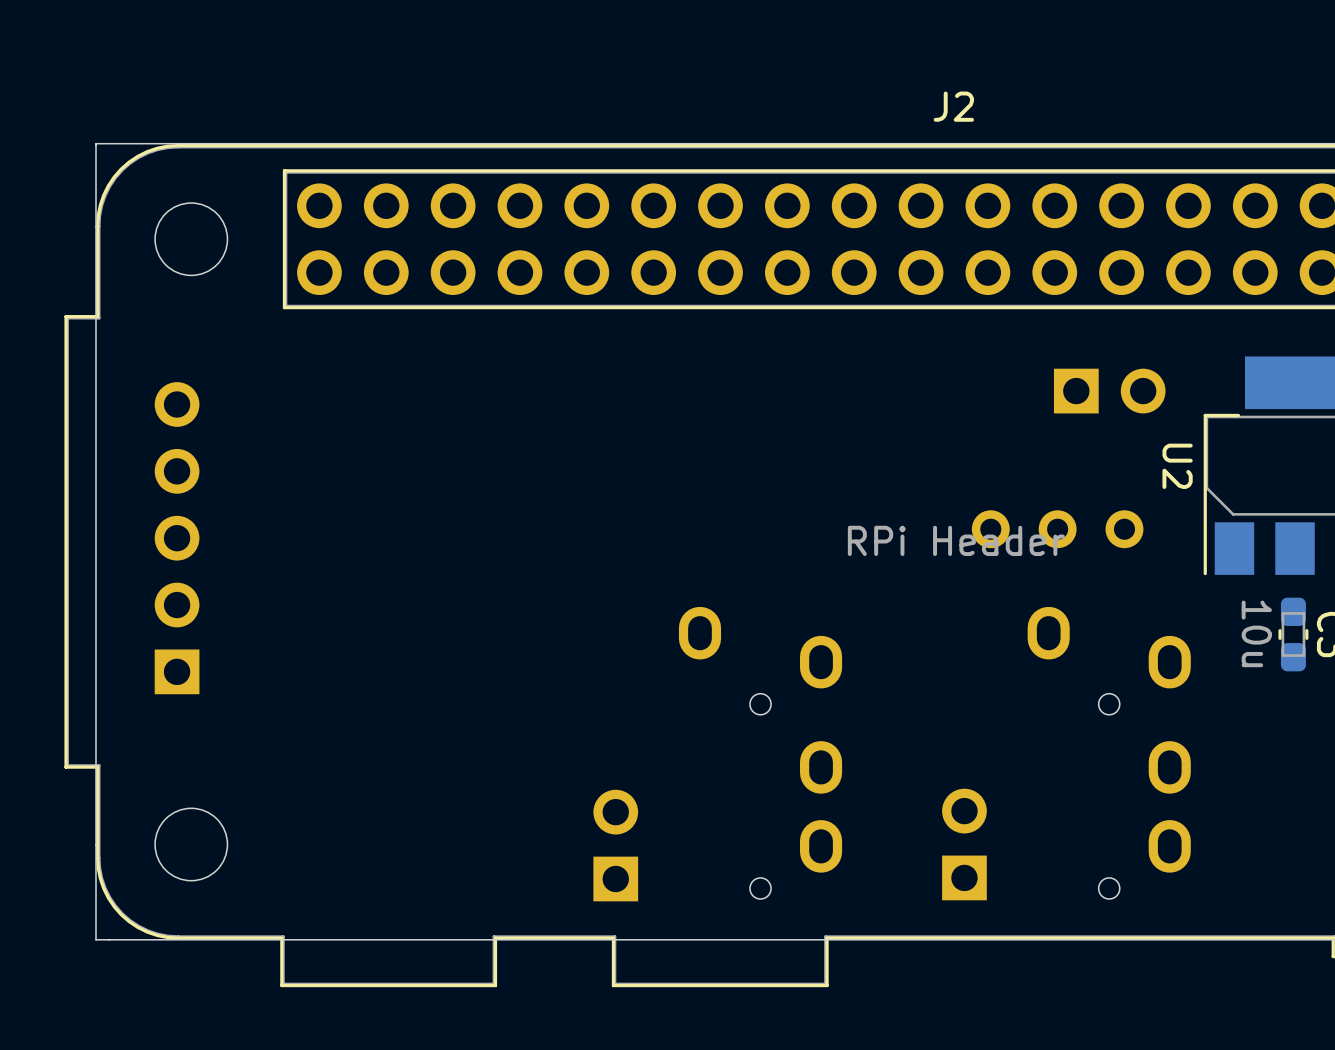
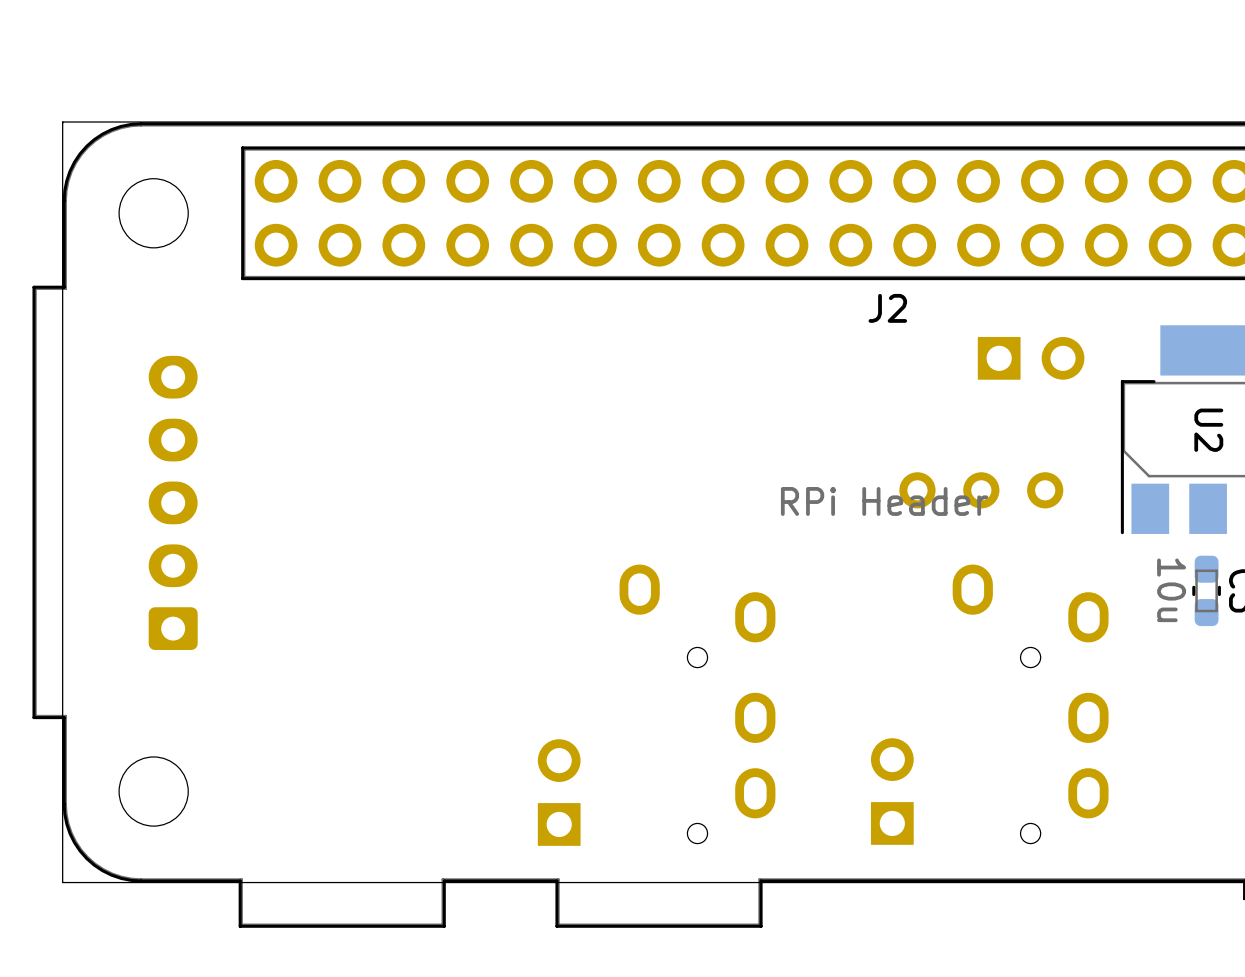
J2 name position: J2 (953, 106) -> J2 (887, 308)
U2 name position: U2 (1177, 466) -> U2 (1208, 430)
part: (177, 538) -> none
part: none -> (173, 502)

